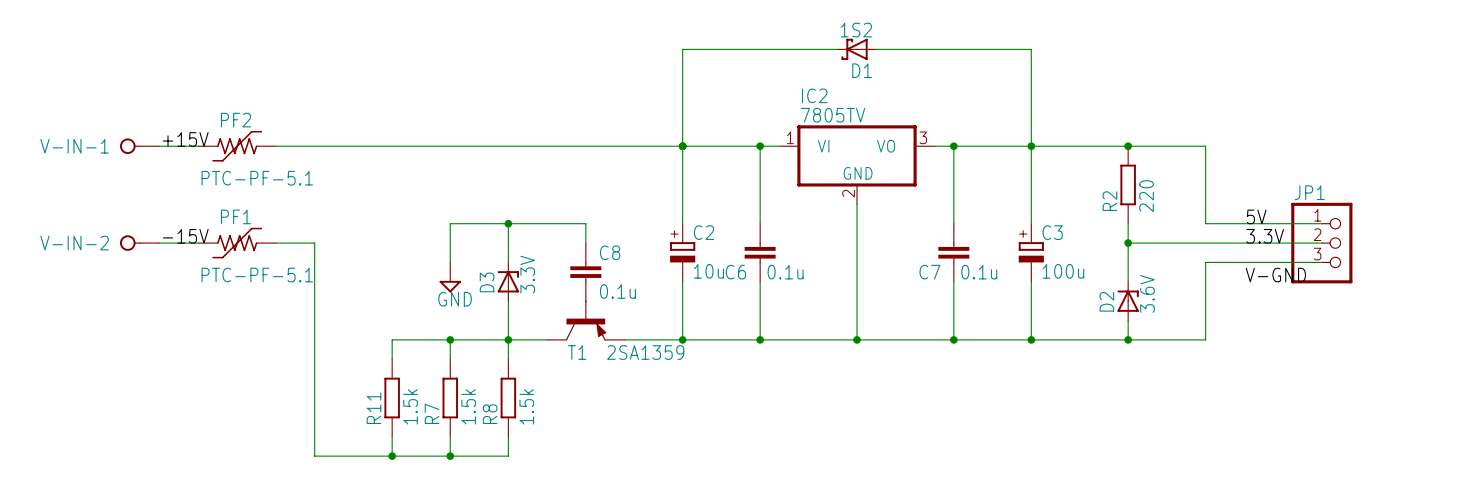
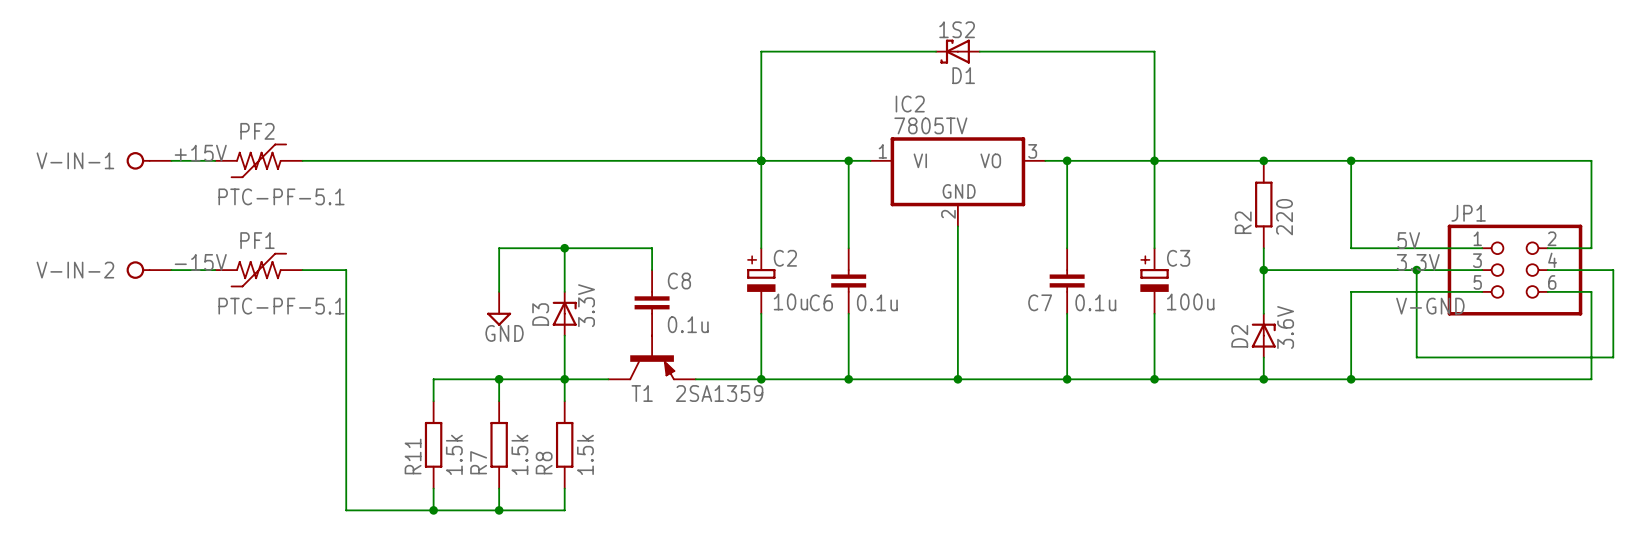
wire: none -> (1351, 160) (1591, 160) (1591, 248) (1547, 248)
junction: none -> (1351, 160)
JP1 symbol: [1291, 202, 1353, 284] -> [1447, 224, 1583, 316]
wire: none -> (1416, 270) (1416, 357) (1613, 357) (1613, 270) (1547, 270)
junction: none -> (1416, 270)
wire: none -> (1547, 291) (1591, 291) (1591, 379) (1351, 379)
junction: none -> (1351, 379)

